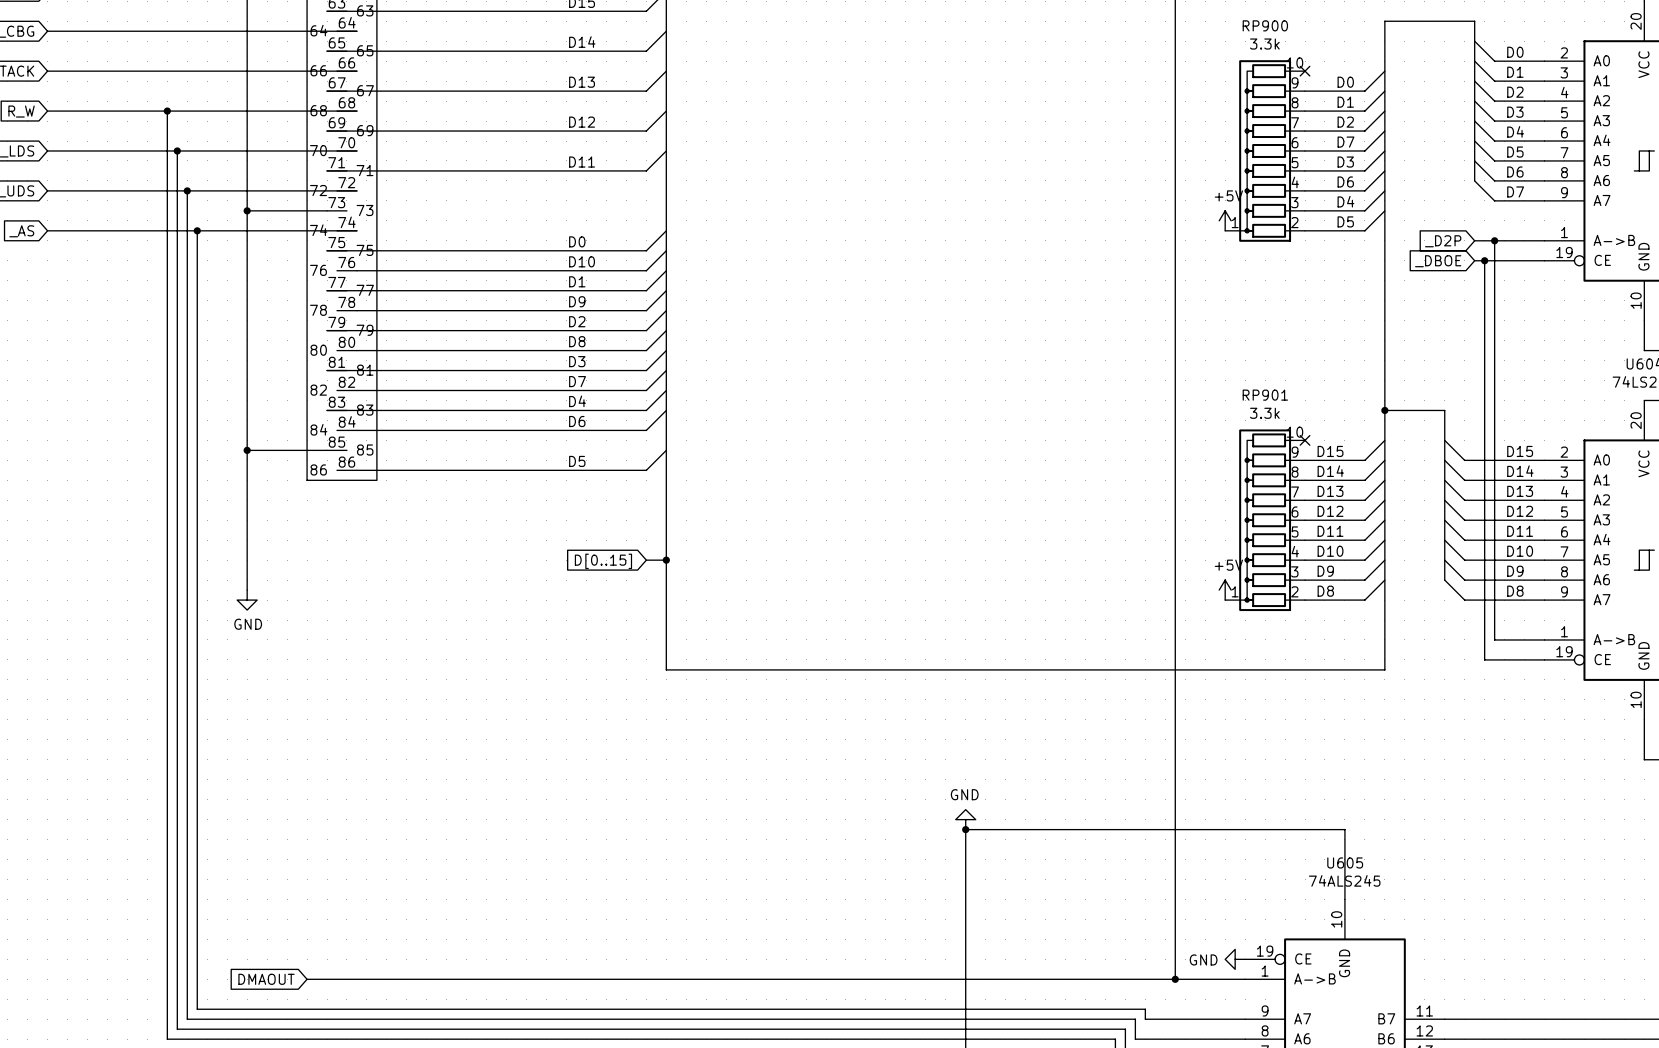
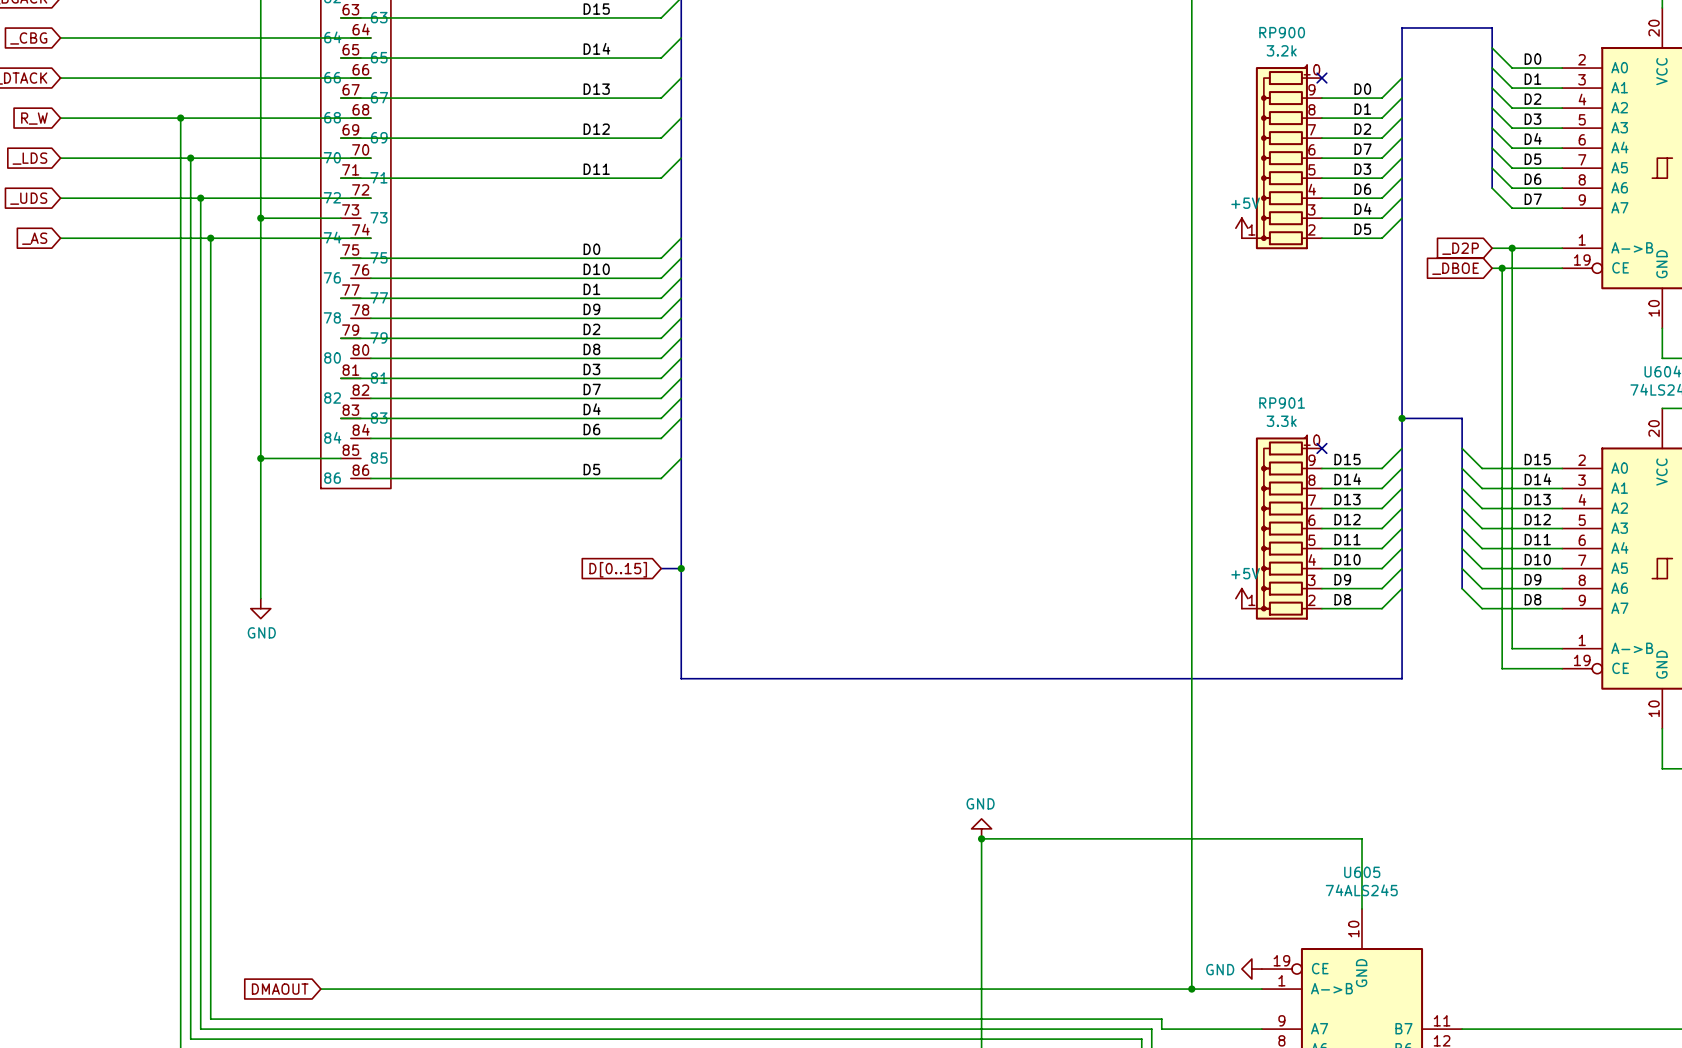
RP900 value: 3.3k (1264, 44) -> 3.2k (1281, 50)

